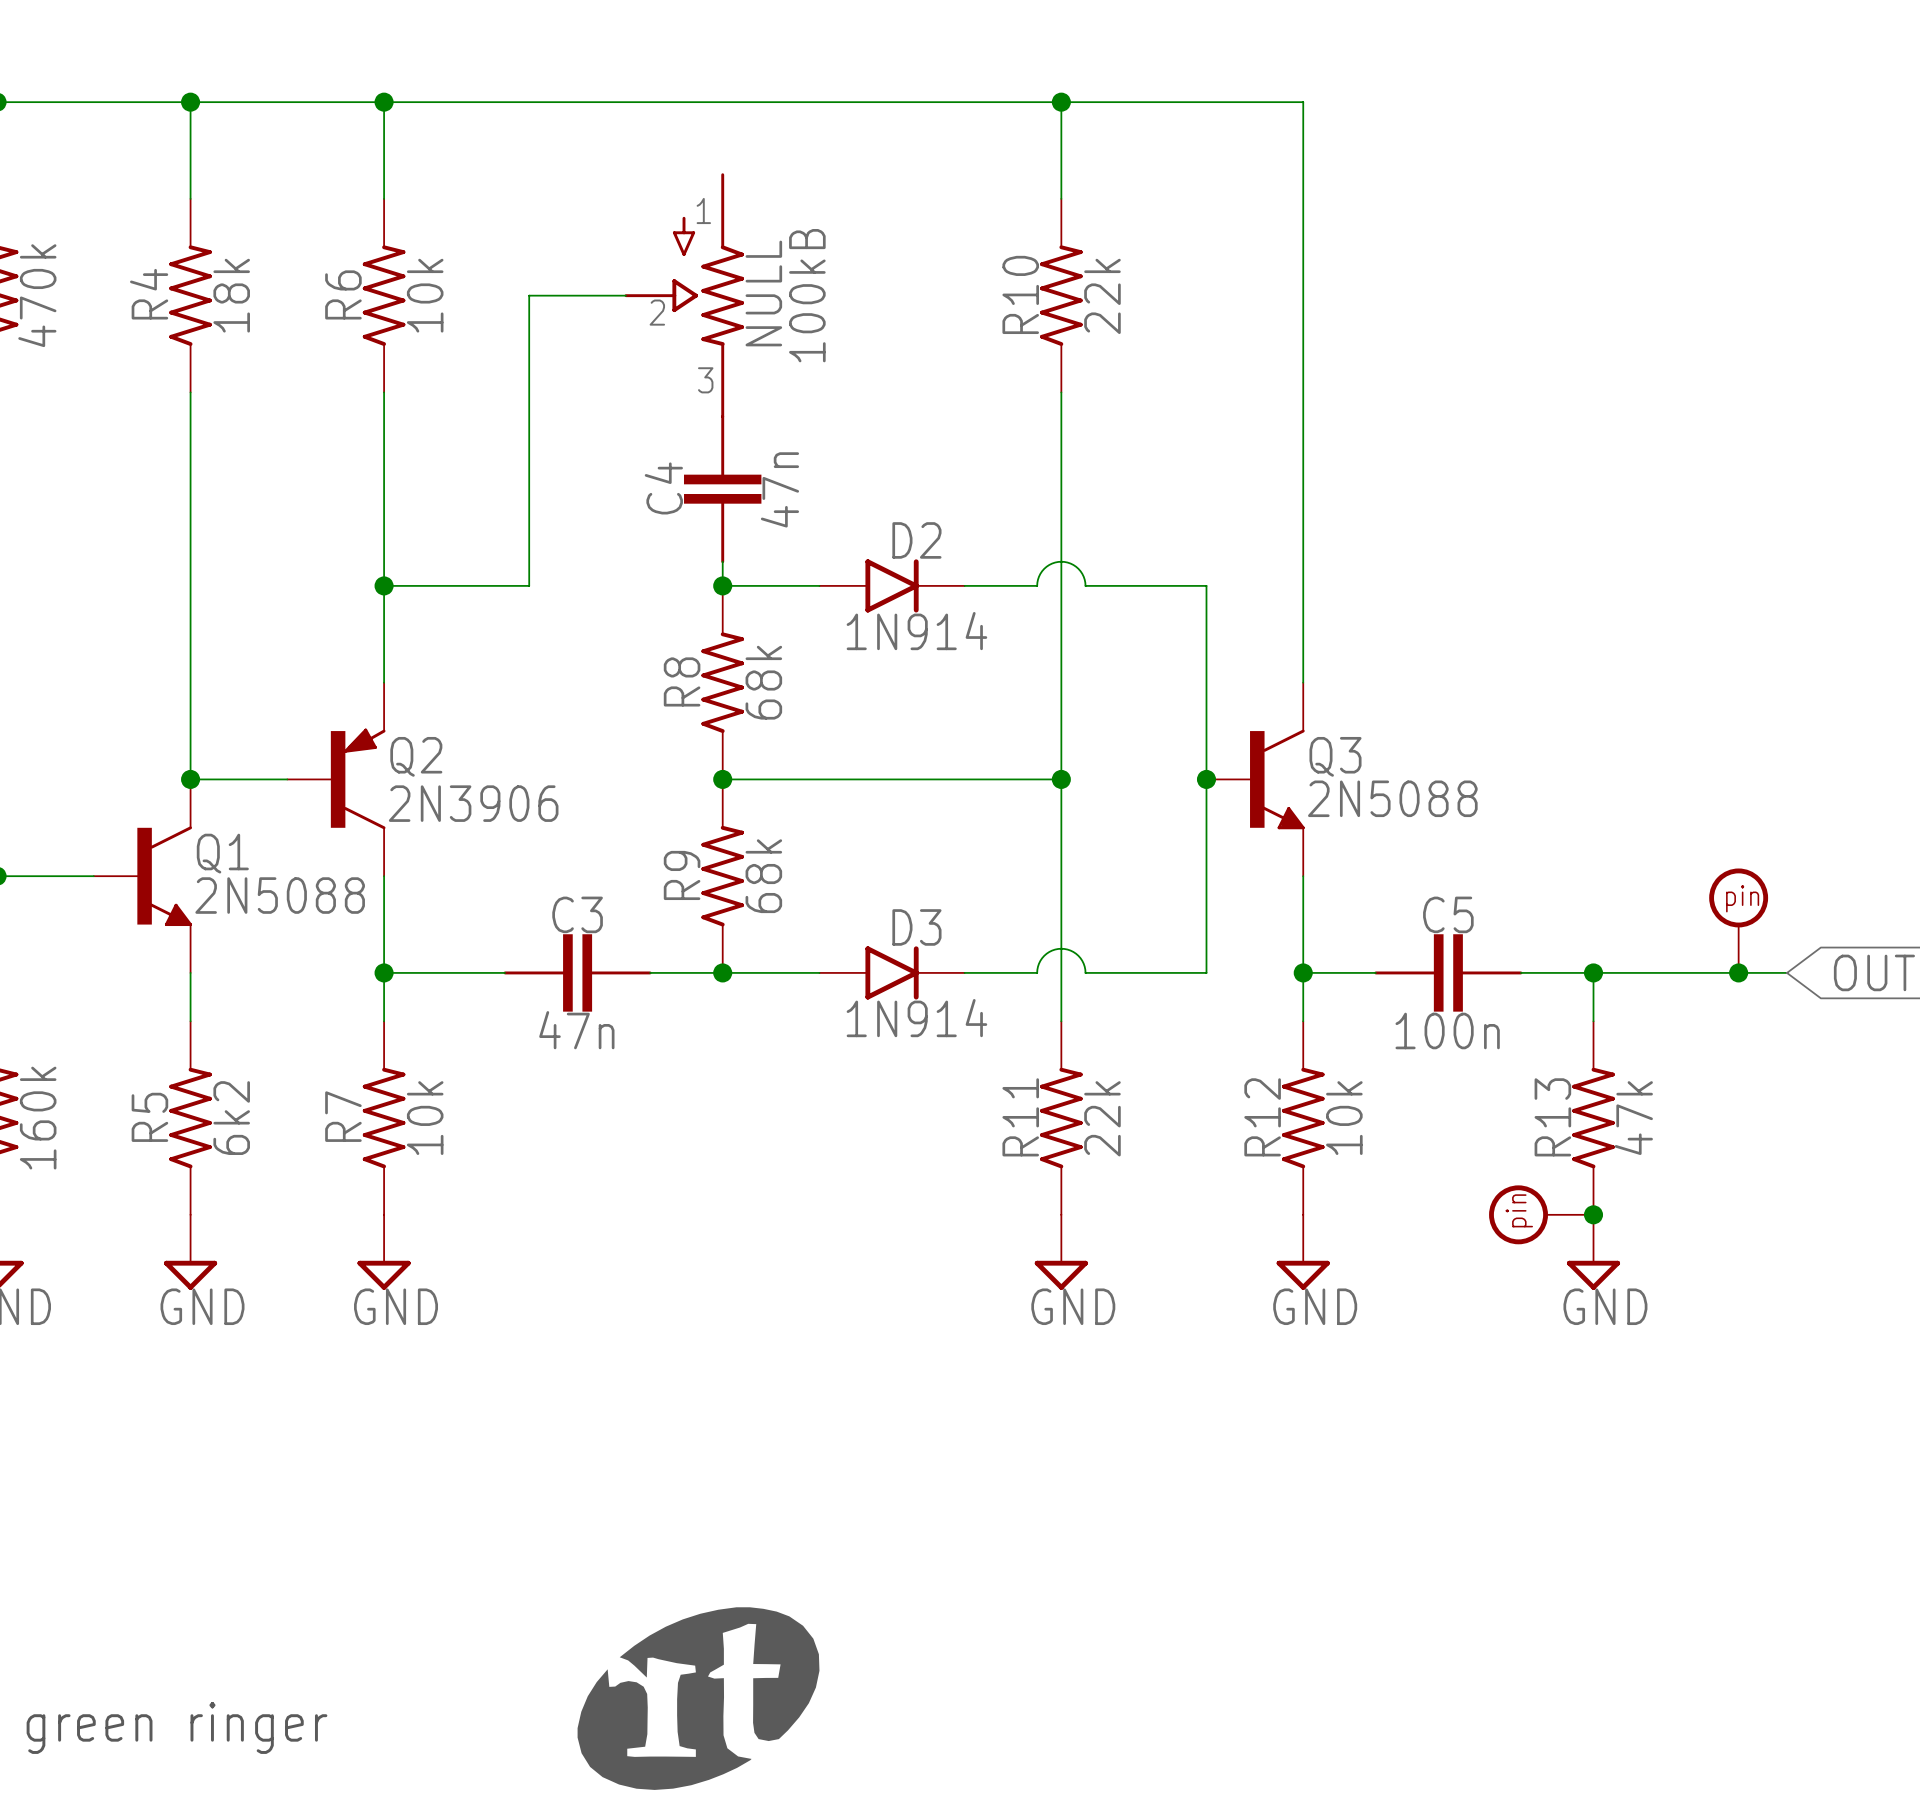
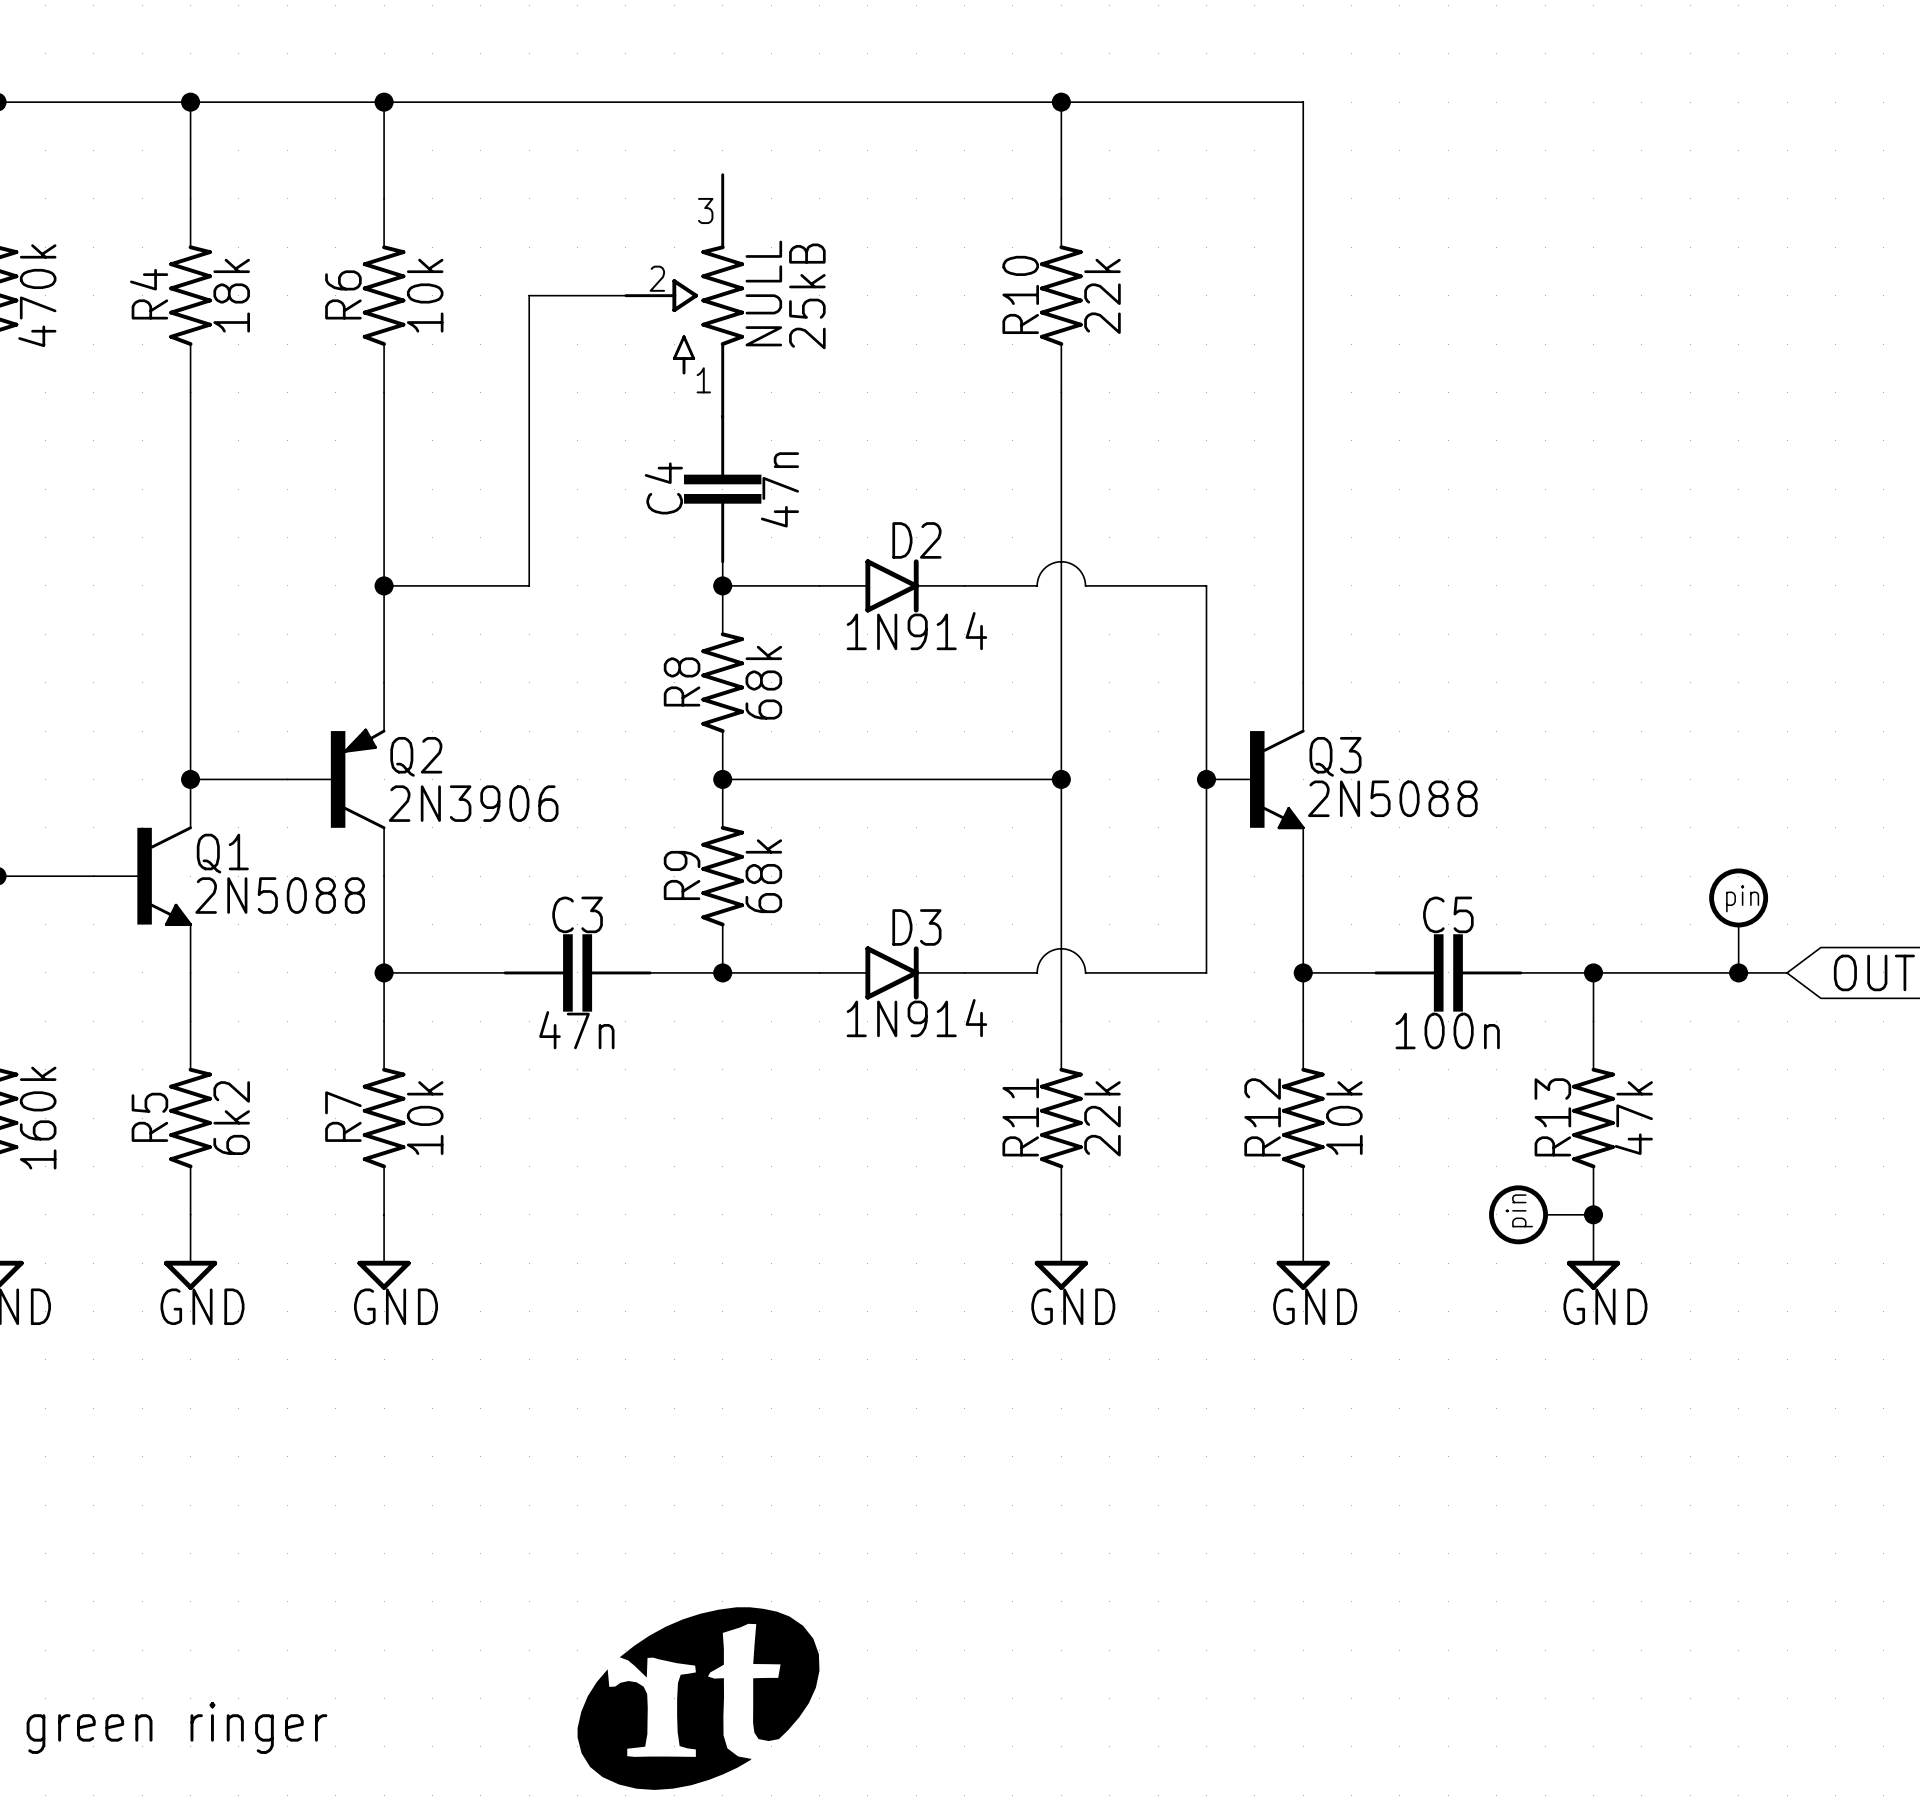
NULL symbol: [624, 173, 745, 419] -> [624, 173, 745, 419]
NULL value: 100kB (807, 295) -> 25kB (807, 296)

